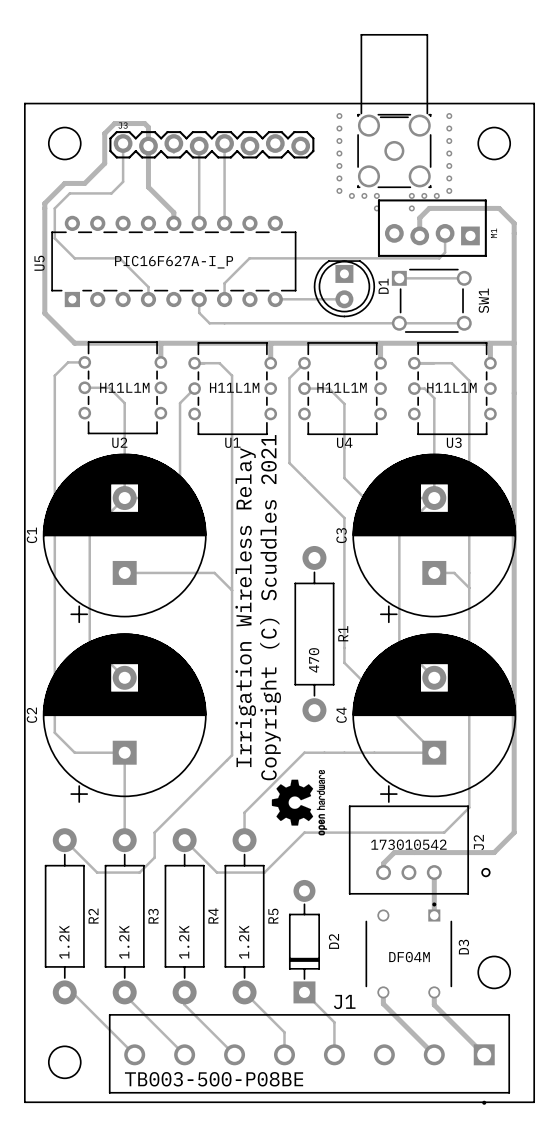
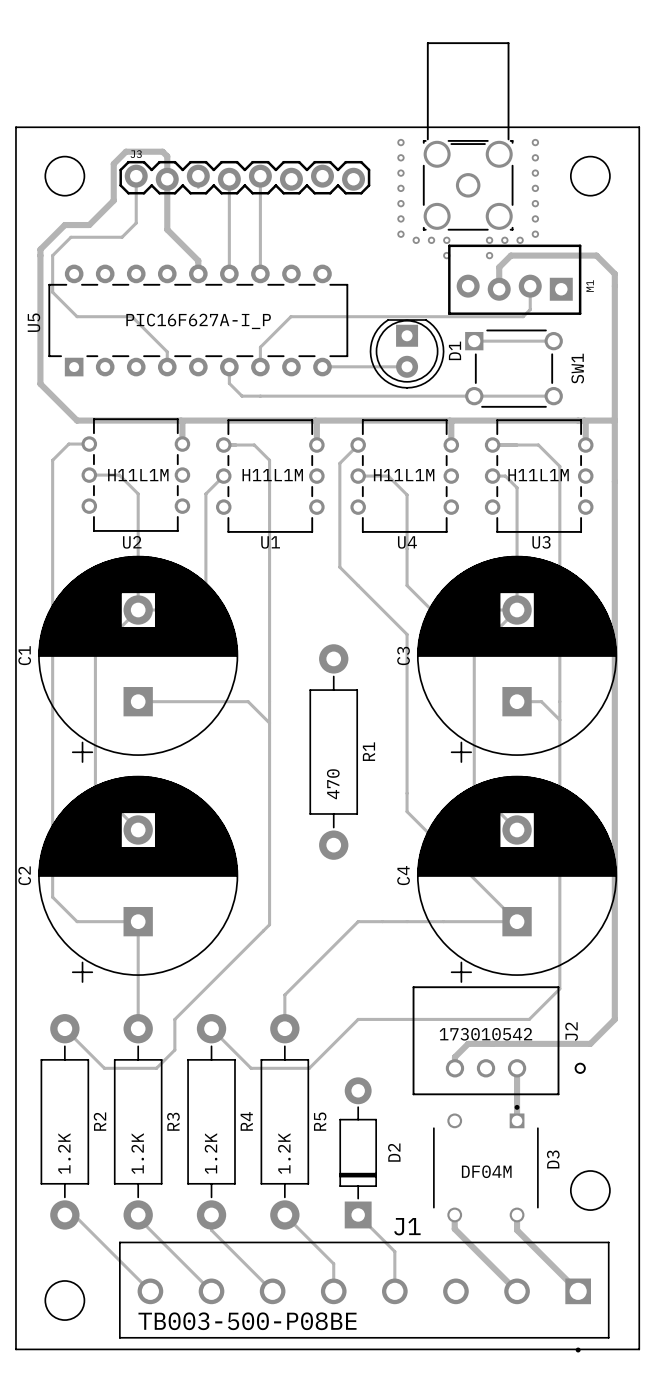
text: Irrigation Wireless Relay (245, 607) -> none
text: Copyright (C) Scuddles 2021 (270, 607) -> none
R1 position: (314, 634) -> (333, 752)
drawing: [271, 769, 328, 836] -> none

